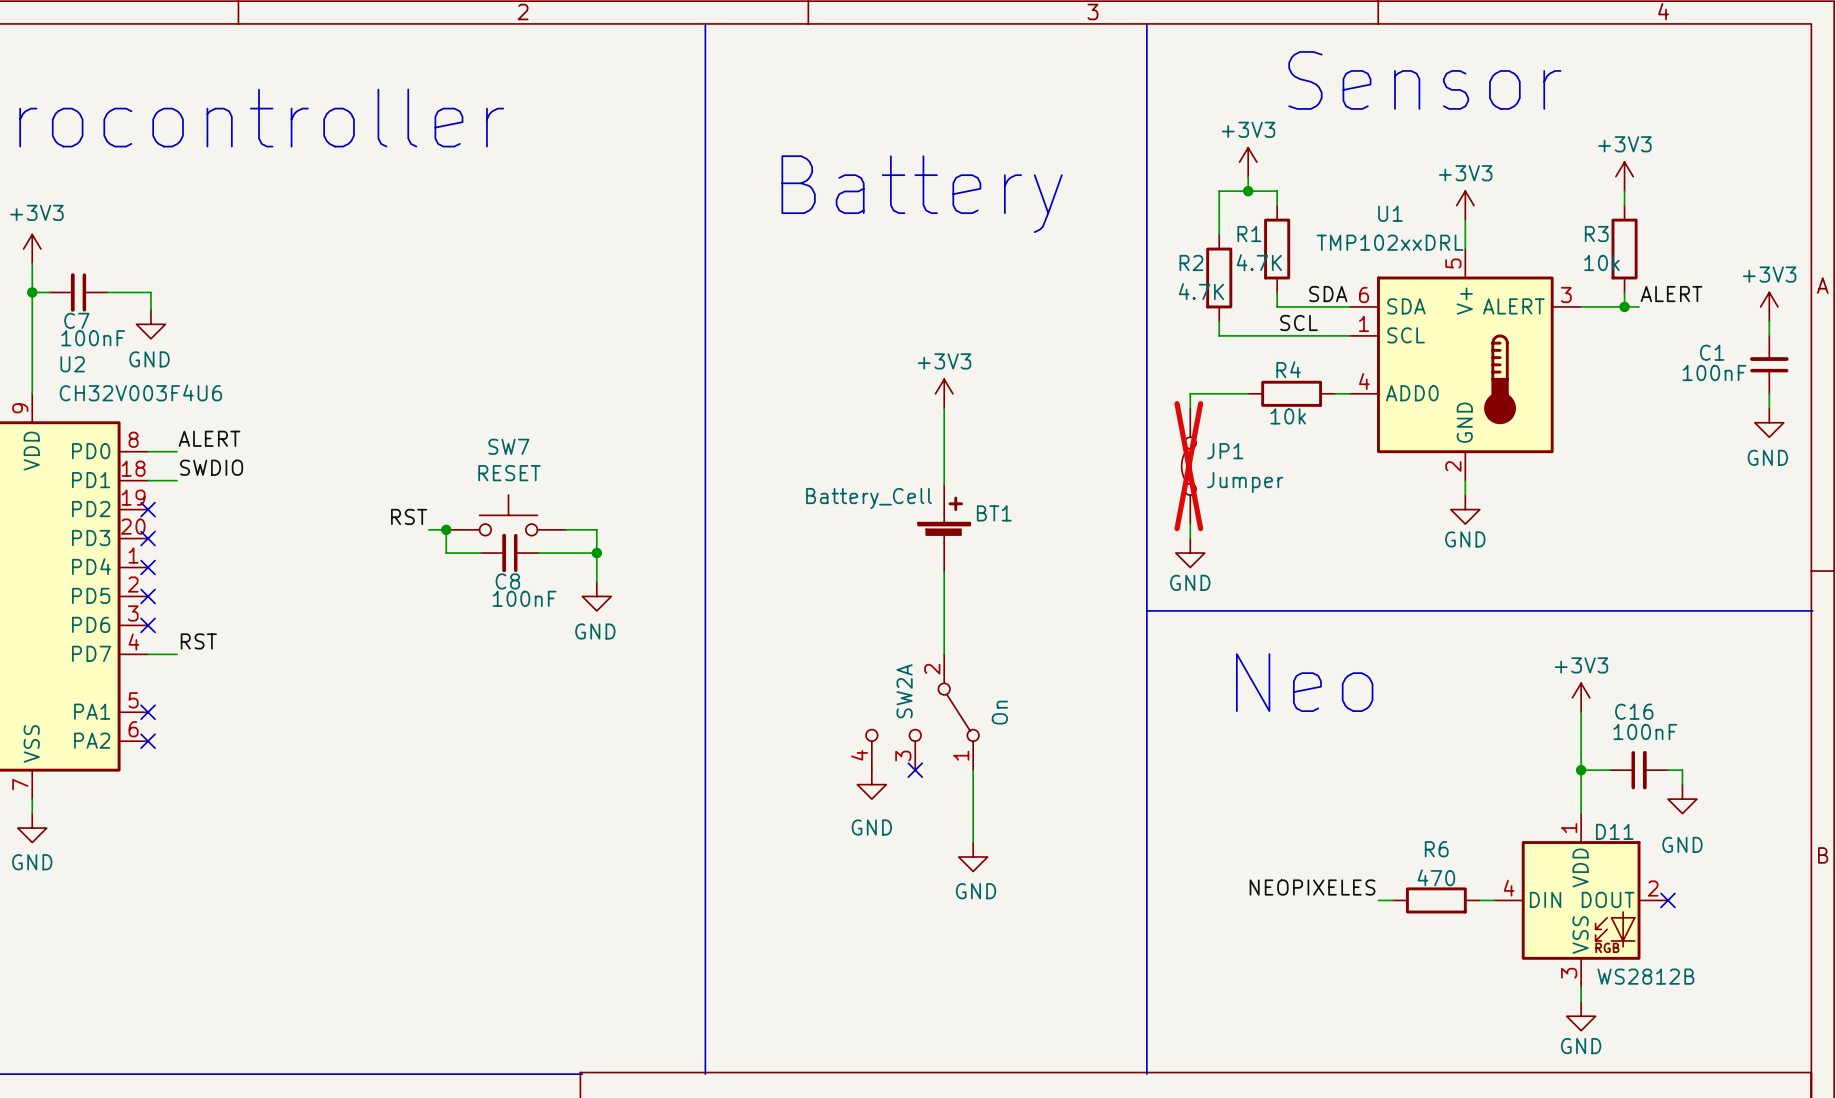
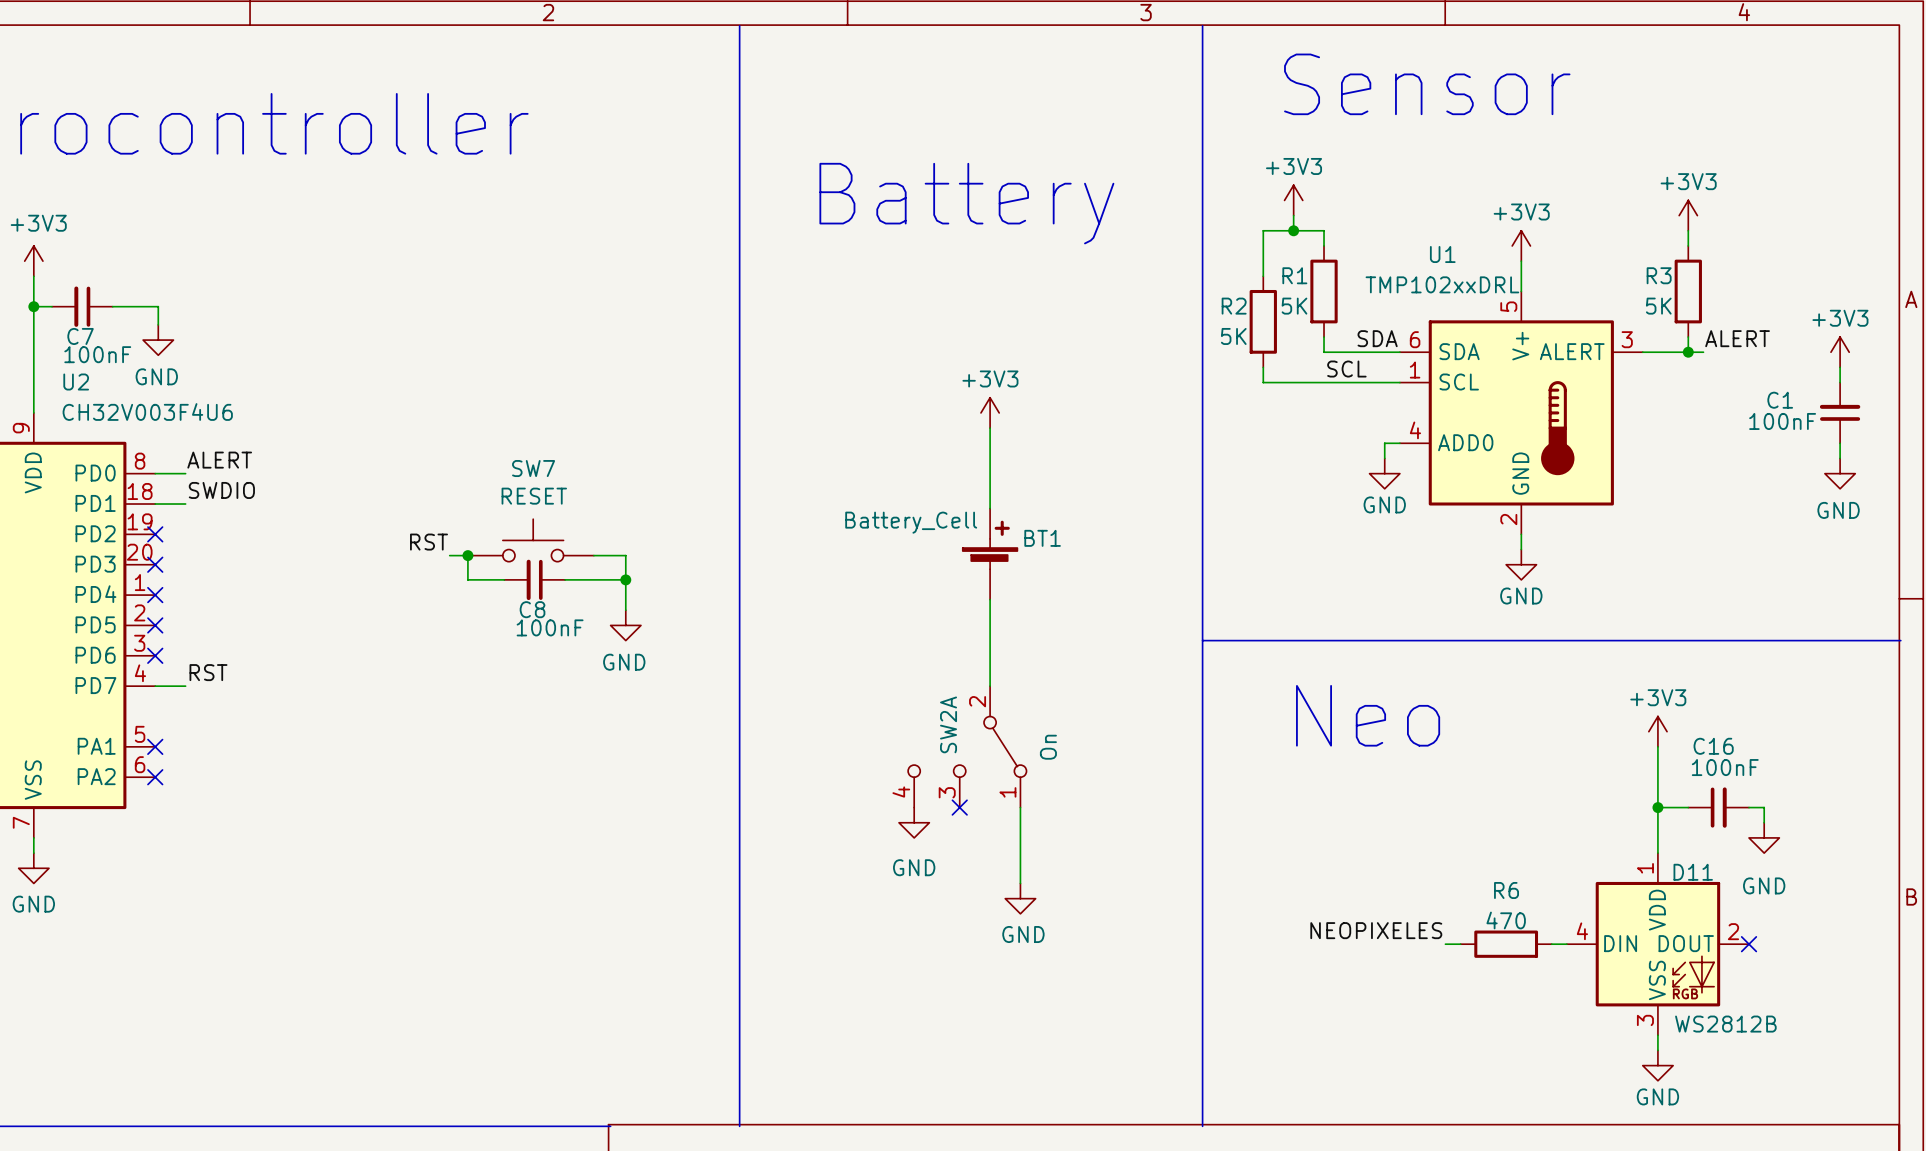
text position: Sensor (1424, 80) -> Sensor (1427, 84)
power symbol position: +3V3 (1248, 162) -> +3V3 (1293, 200)
wire: (1248, 176) (1248, 191) -> (1293, 215) (1293, 230)
power symbol position: +3V3 (1624, 176) -> +3V3 (1688, 215)
junction position: (1248, 191) -> (1293, 230)
wire: (1624, 191) (1624, 205) -> (1688, 230) (1688, 245)
wire: (1277, 205) (1277, 191) (1219, 191) (1219, 234) -> (1324, 245) (1324, 230) (1263, 230) (1263, 276)
power symbol position: +3V3 (1465, 205) -> +3V3 (1521, 245)
wire: (1465, 220) (1465, 249) -> (1521, 261) (1521, 291)
R1 position: (1277, 249) -> (1324, 291)
R3 position: (1624, 249) -> (1688, 291)
R1 value: 4.7K (1259, 262) -> 5K (1294, 306)
R3 value: 10k (1601, 262) -> 5K (1658, 306)
R2 position: (1219, 277) -> (1263, 321)
R2 value: 4.7K (1201, 291) -> 5K (1233, 336)
wire: (1277, 292) (1277, 306) (1349, 306) -> none
wire: (1624, 292) (1624, 306) -> (1688, 337) (1688, 352)
label position: SDA (1328, 294) -> SDA (1377, 338)
label position: ALERT (1671, 294) -> ALERT (1737, 338)
wire: (1581, 306) (1639, 306) -> (1642, 352) (1703, 352)
junction position: (1624, 306) -> (1688, 352)
power symbol position: +3V3 (1769, 306) -> +3V3 (1840, 352)
wire: (1219, 321) (1219, 335) (1262, 335) -> (1324, 337) (1324, 352)
wire: (1769, 321) (1769, 335) -> (1840, 367) (1840, 382)
label position: SCL (1298, 322) -> SCL (1346, 369)
wire: none -> (1263, 367) (1263, 382) (1399, 382)
U1 position: (1465, 364) -> (1521, 412)
C1 position: (1769, 364) -> (1840, 412)
wire: (1248, 393) (1190, 393) (1190, 408) -> none
R4: 10k (1291, 393) -> none
wire: (1335, 393) (1349, 393) -> none
wire: (1769, 393) (1769, 408) -> (1840, 443) (1840, 458)
wire: none -> (1399, 443) (1384, 443) (1384, 458)
power symbol position: GND (1769, 422) -> GND (1840, 473)
power symbol: none -> GND (1384, 473)
JP1: Jumper (1188, 466) -> none
wire: (1465, 480) (1465, 495) -> (1521, 534) (1521, 549)
power symbol position: GND (1465, 509) -> GND (1521, 564)
wire: (1190, 524) (1190, 538) -> none
power symbol: GND (1190, 553) -> none

